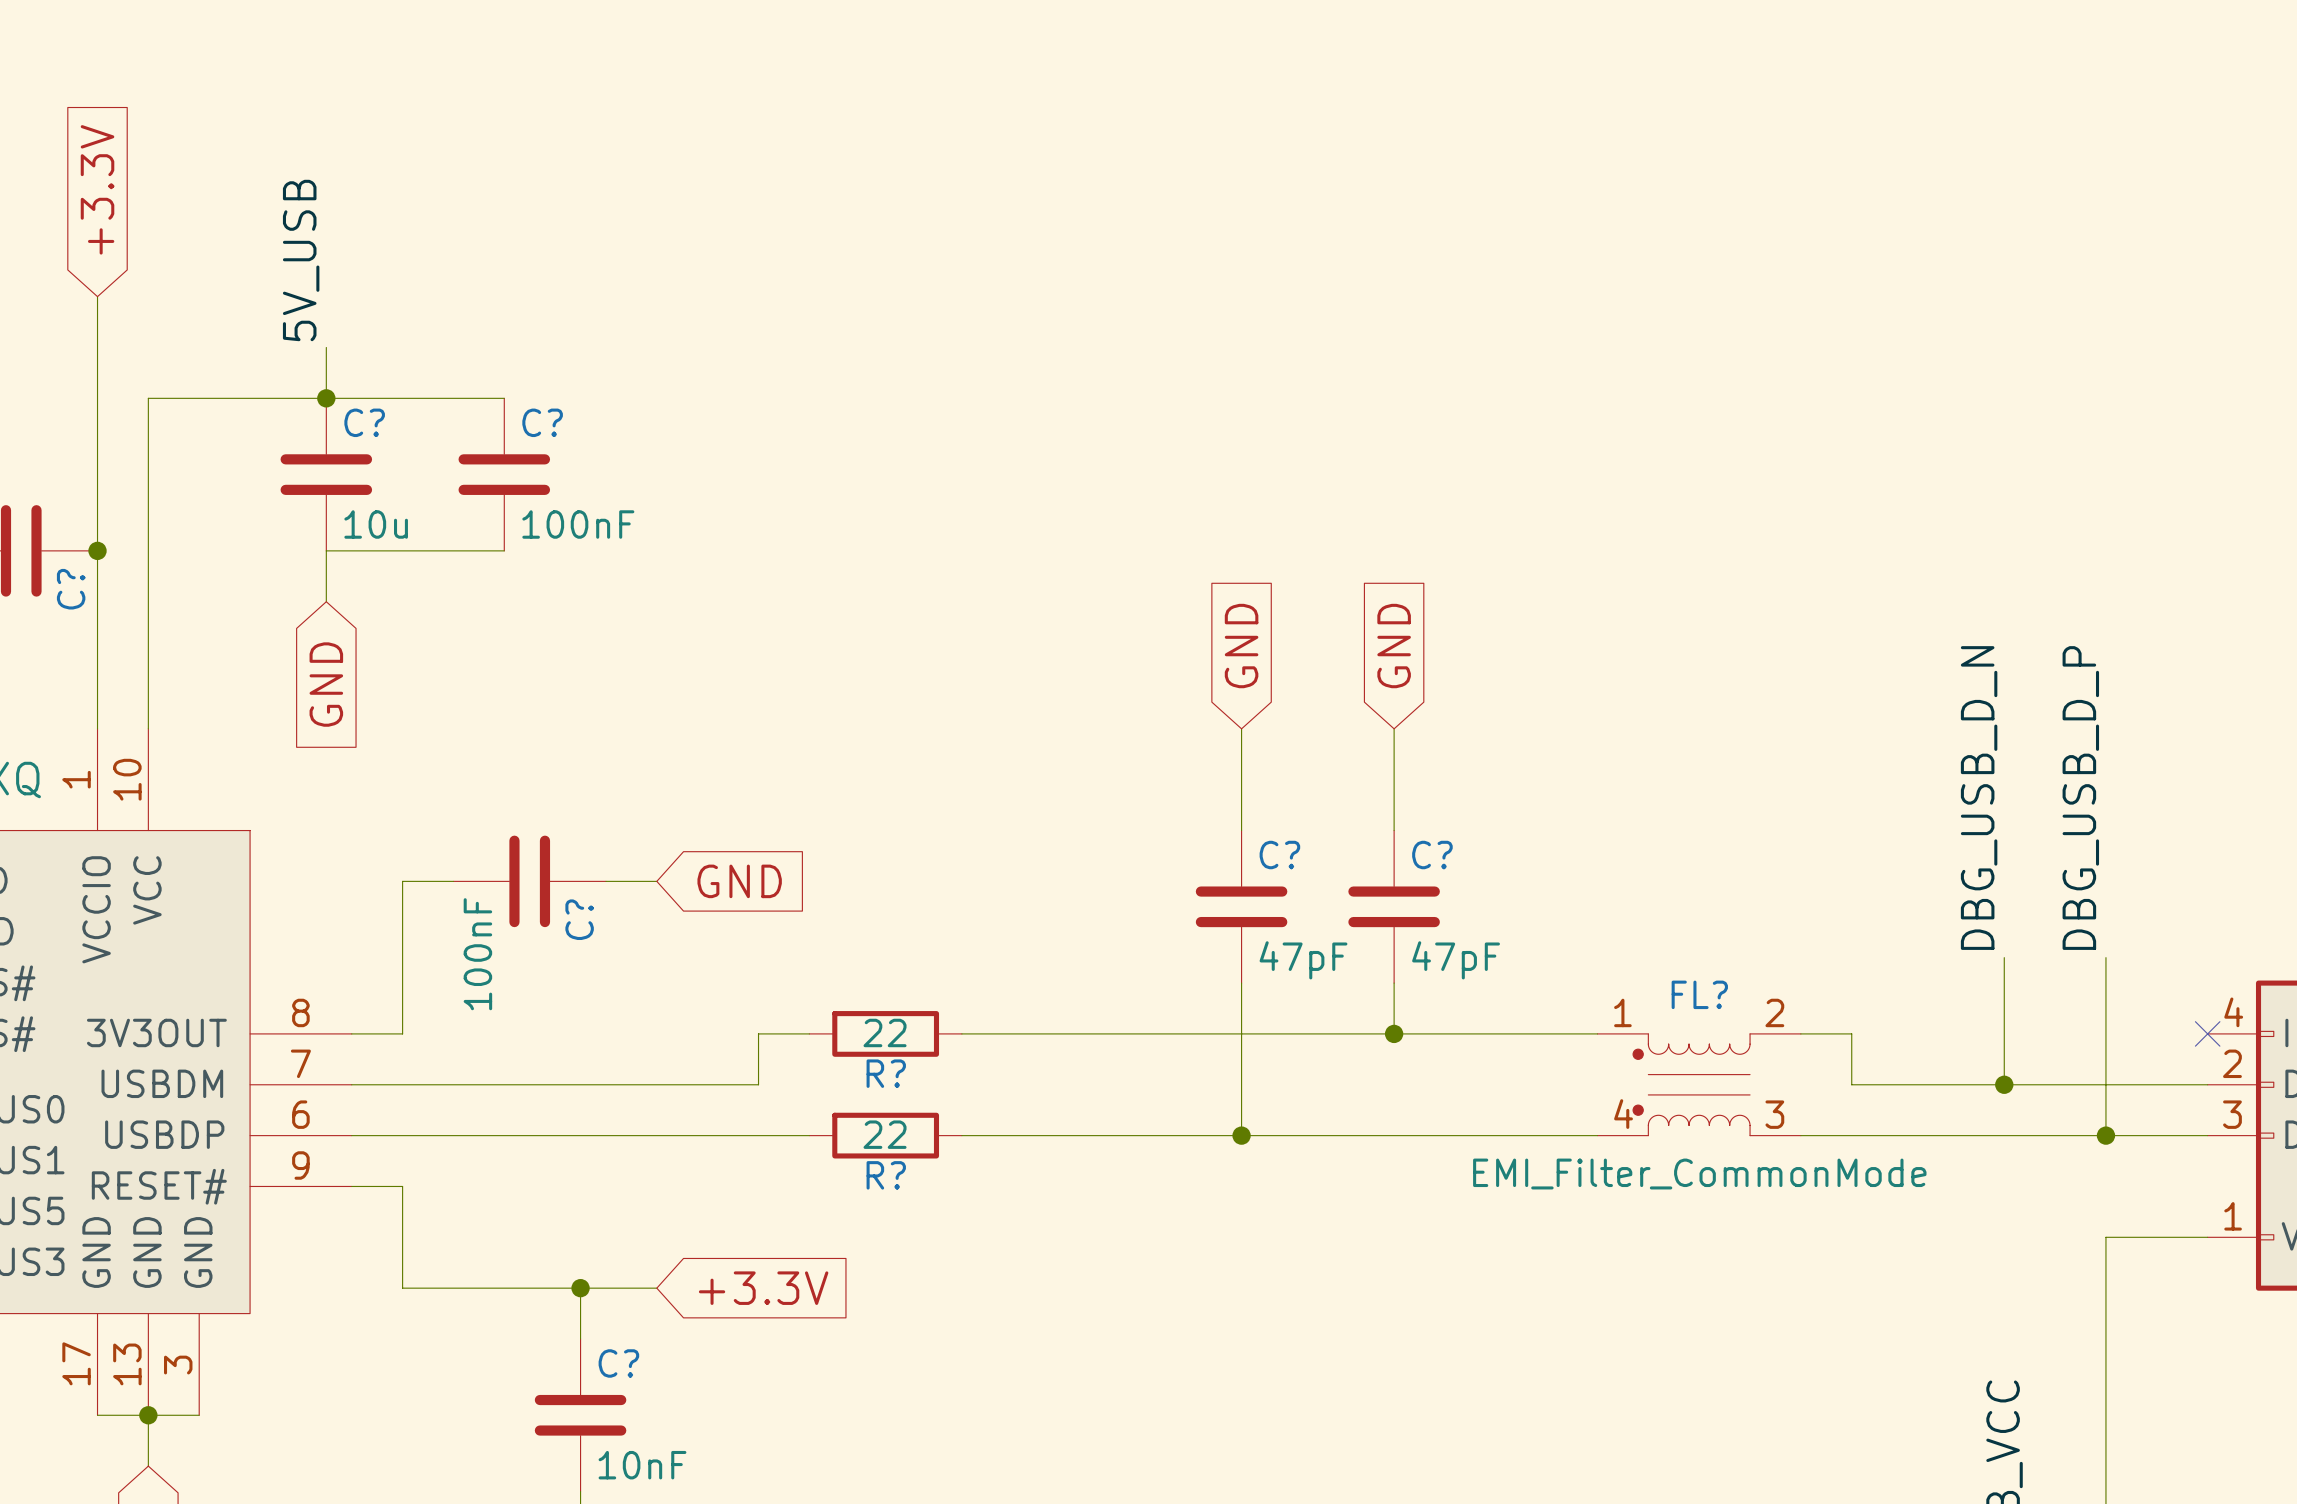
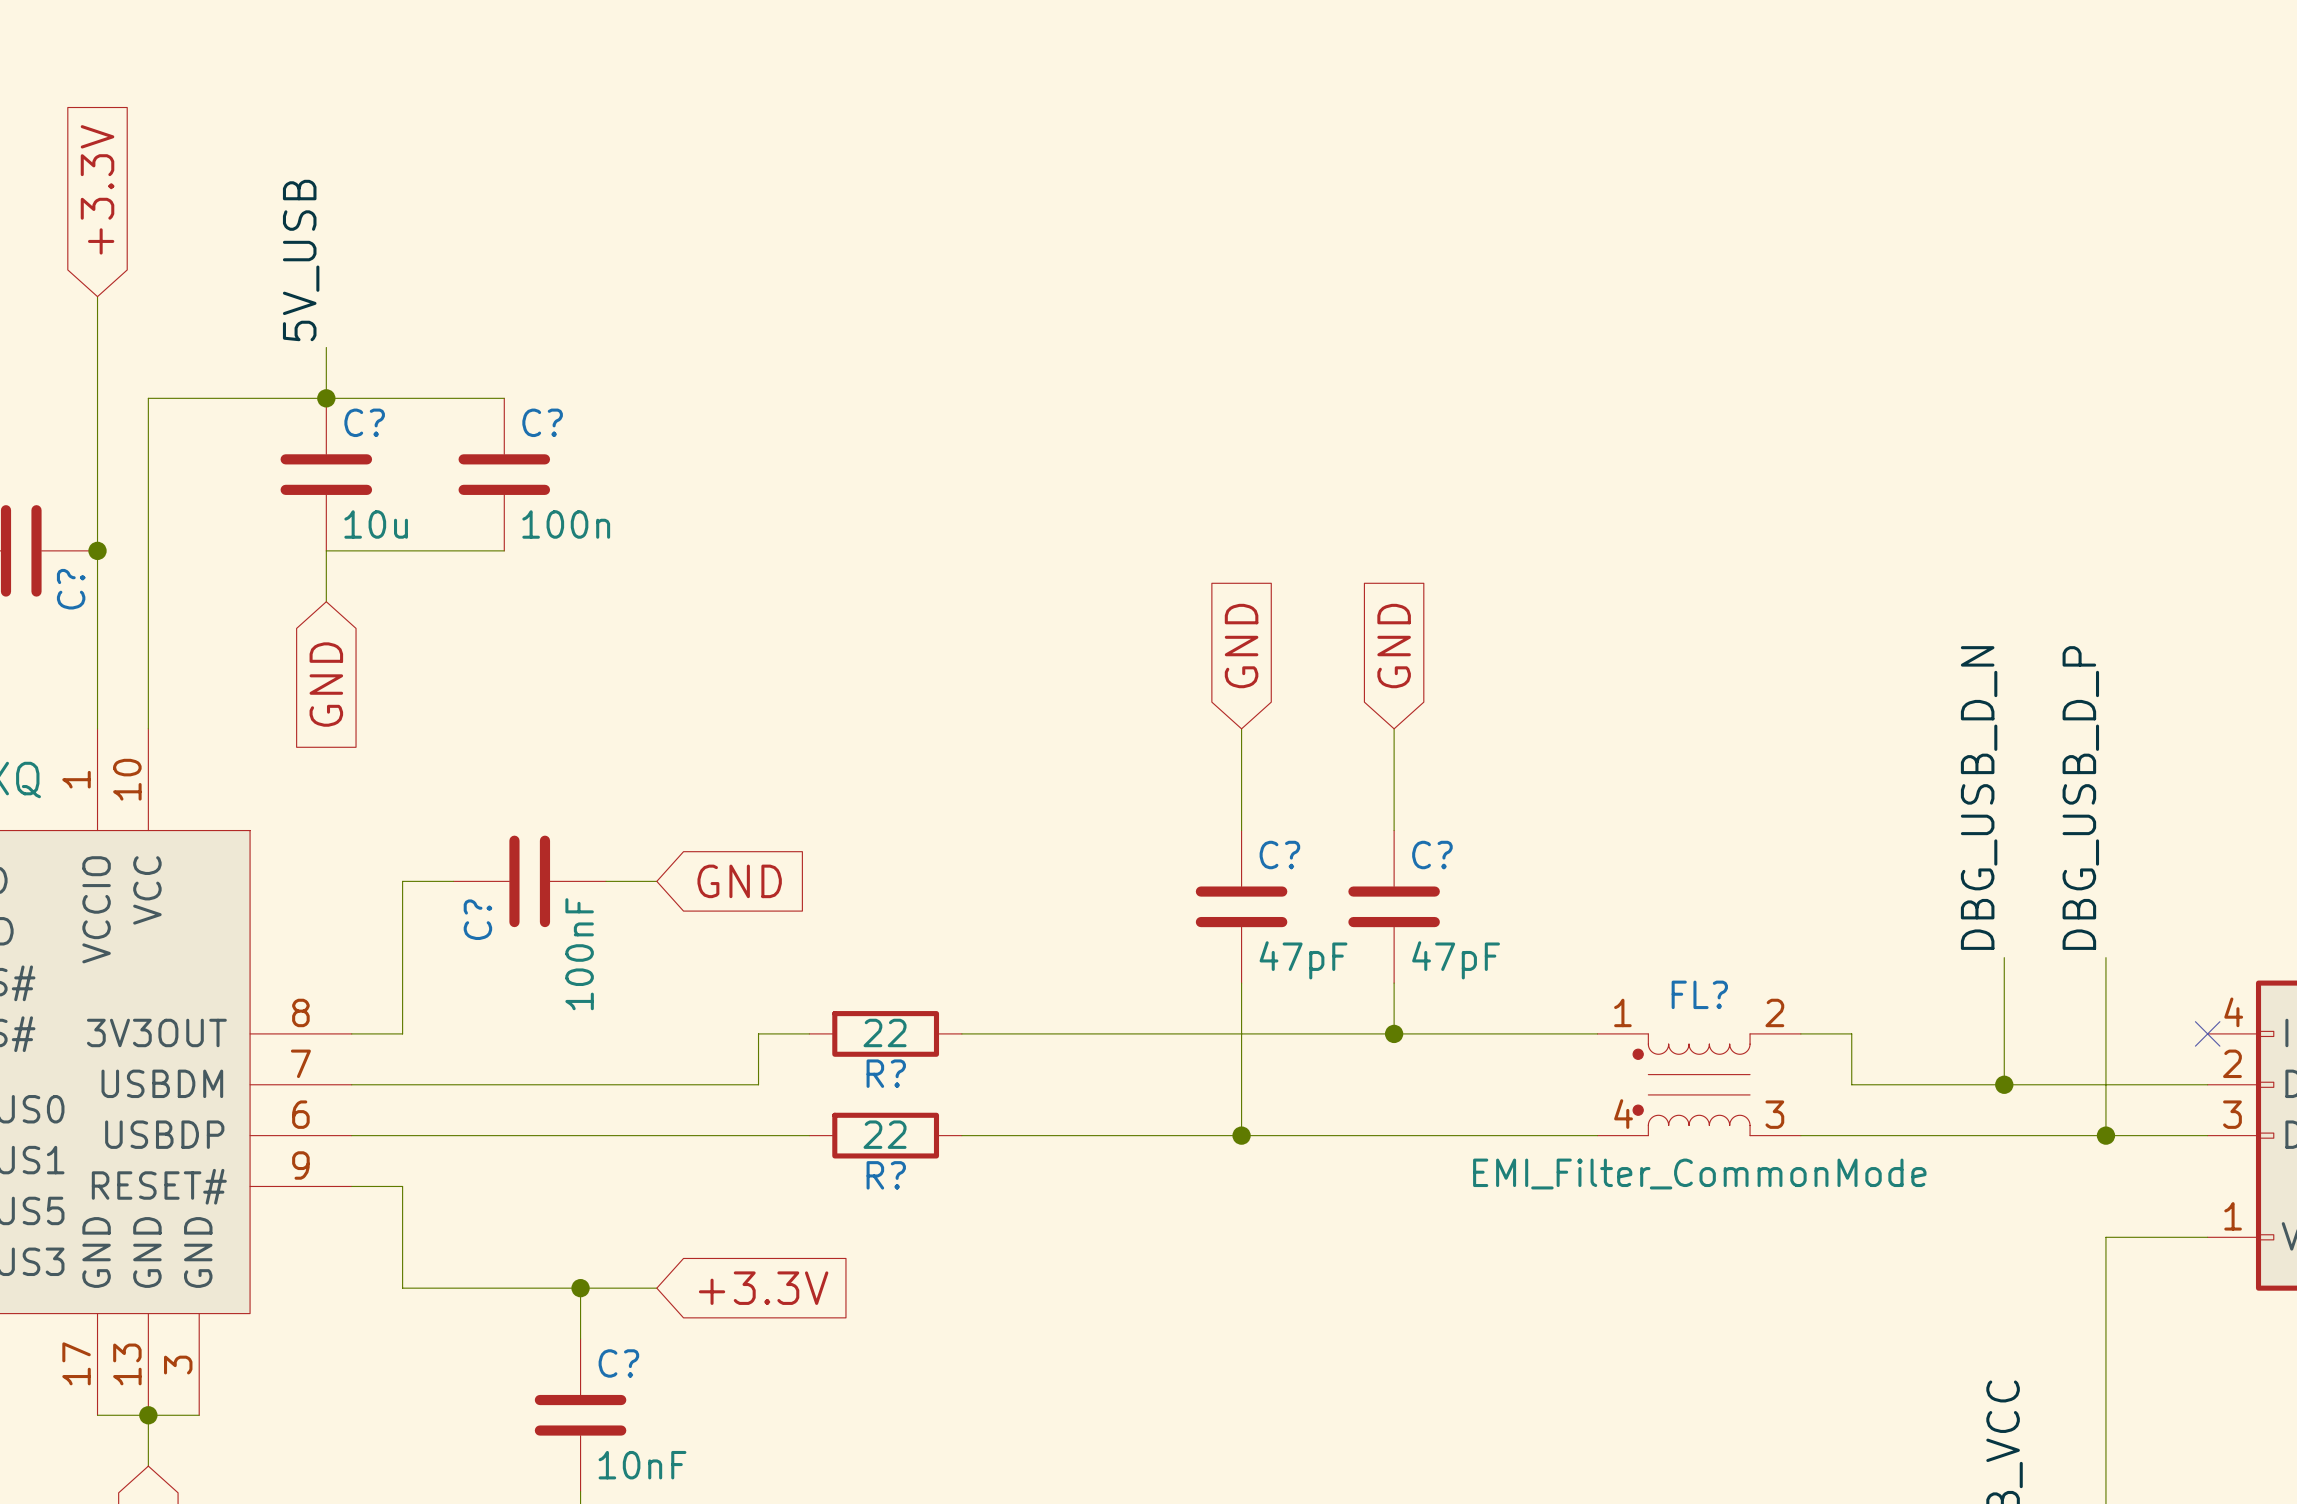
C? value: 100nF (578, 524) -> 100n (566, 524)
C? name position: C? (579, 919) -> C? (477, 919)
C? value position: 100nF (477, 954) -> 100nF (579, 954)

